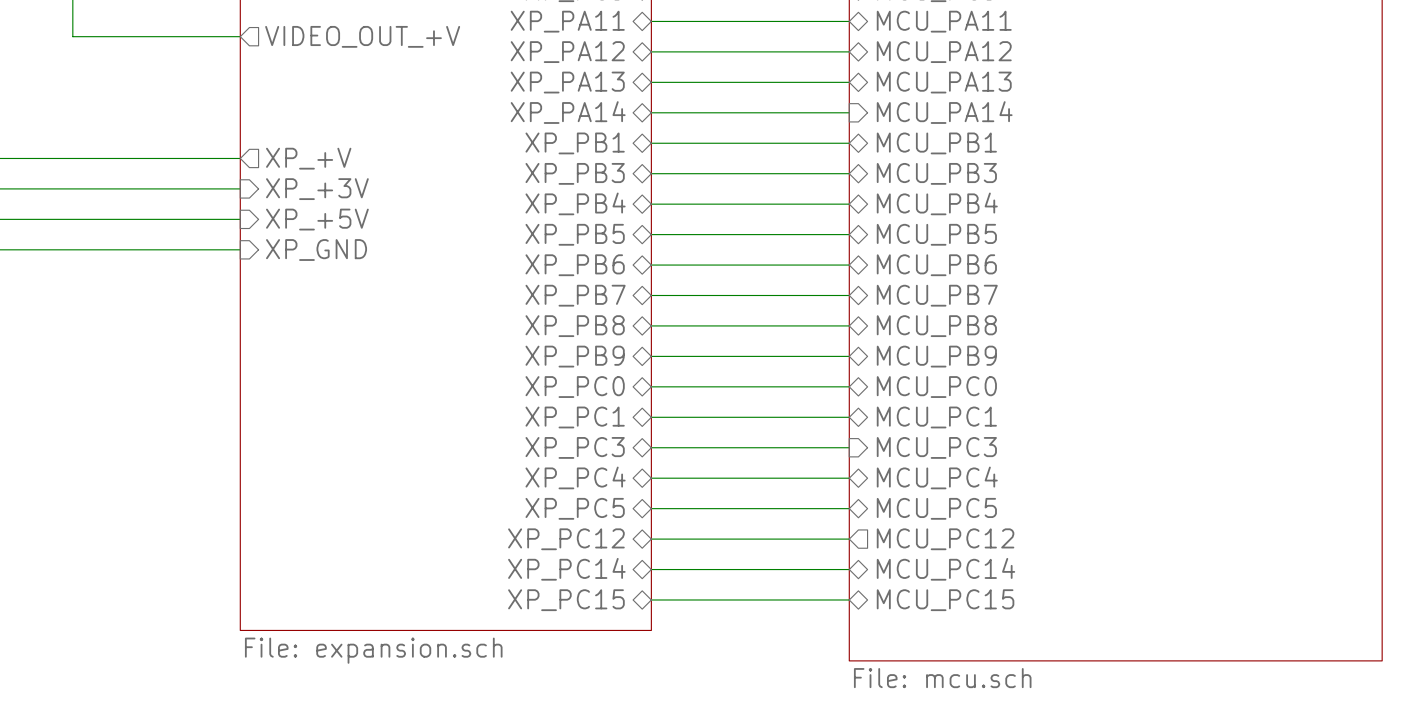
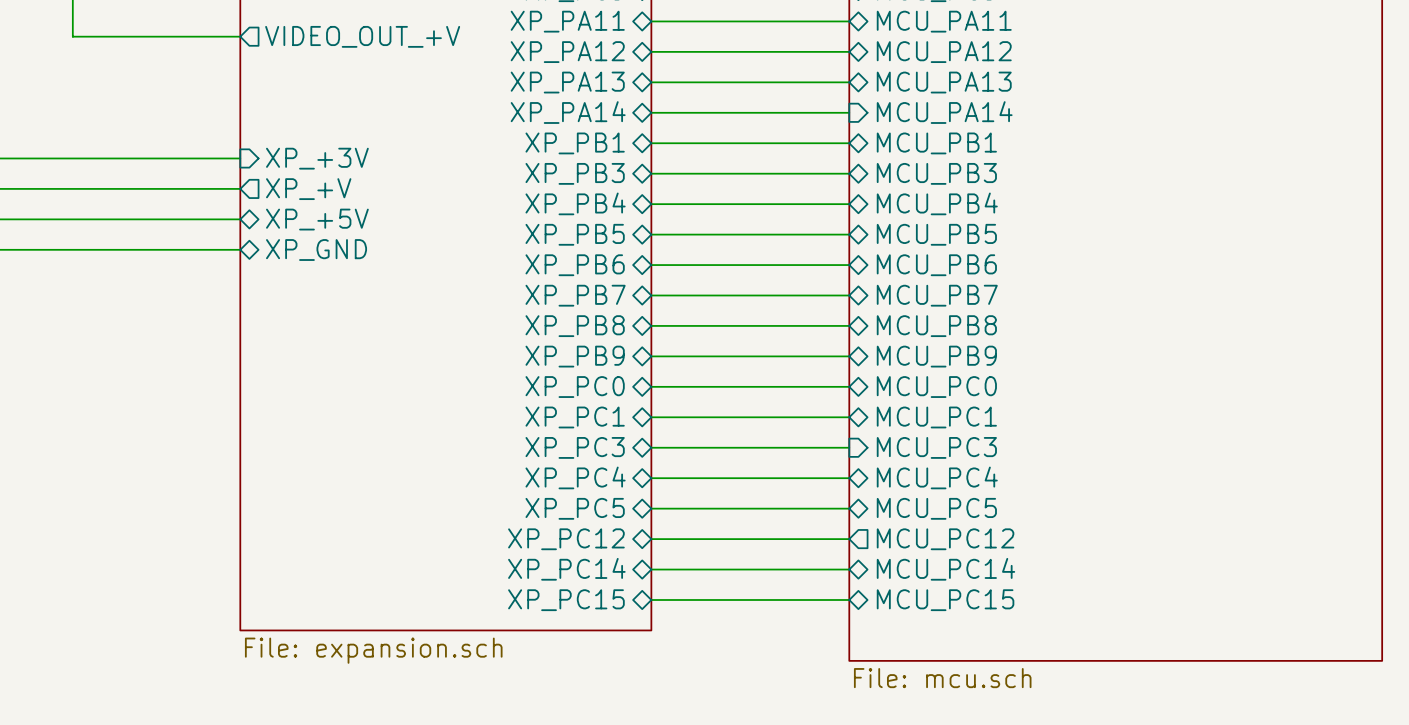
sheet pin shape: output (308, 158) -> input (317, 158)
sheet pin: XP_+V (308, 158) -> XP_+3V (317, 158)
sheet pin shape: input (317, 189) -> output (308, 189)
sheet pin: XP_+3V (317, 189) -> XP_+V (308, 189)
sheet pin shape: input (317, 219) -> bidirectional (317, 219)
sheet pin shape: input (316, 250) -> bidirectional (316, 250)

